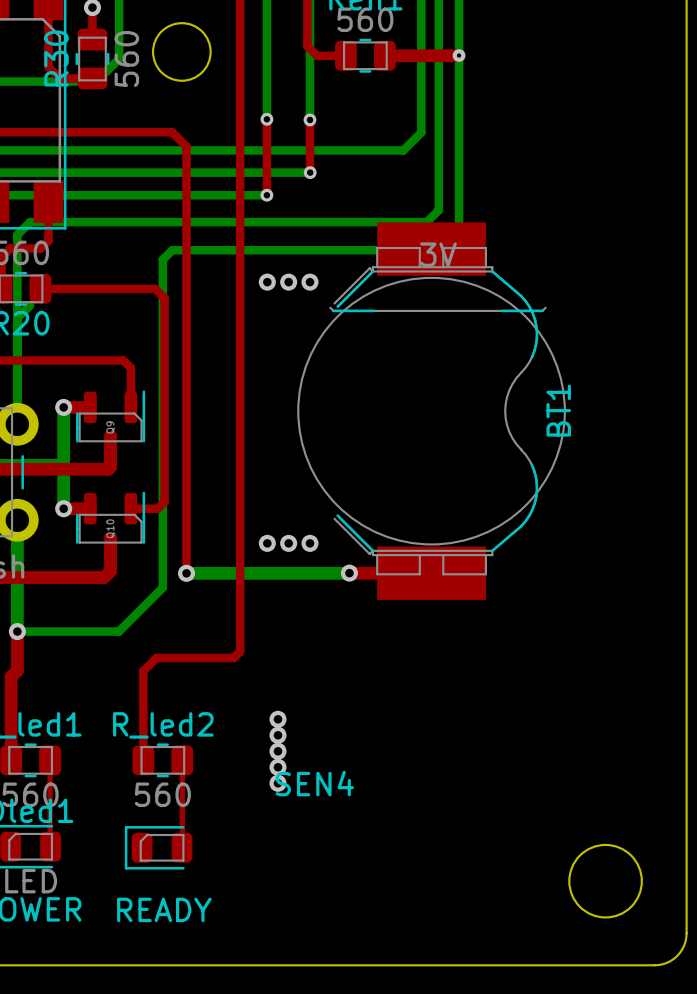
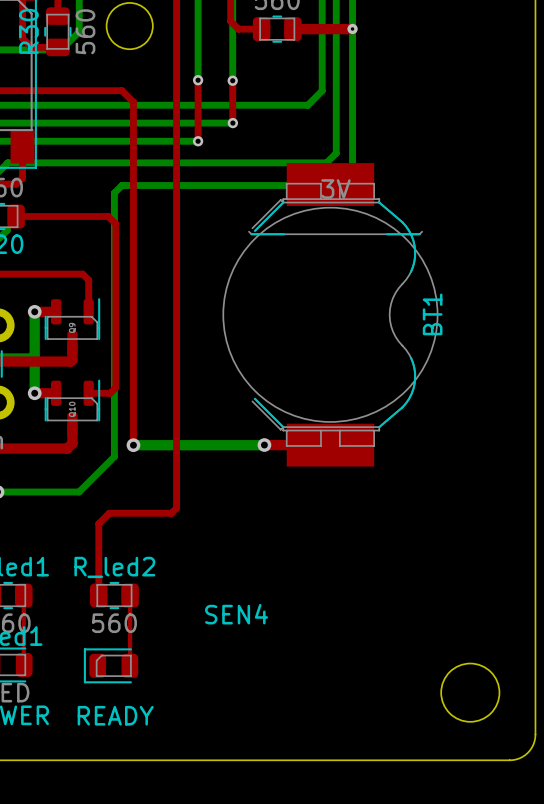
via: (267, 282) -> none
via: (288, 282) -> none
via: (309, 282) -> none
via: (267, 543) -> none
via: (288, 543) -> none
via: (309, 543) -> none
via: (278, 719) -> none
via: (278, 735) -> none
via: (278, 751) -> none
via: (278, 767) -> none
via: (278, 783) -> none

